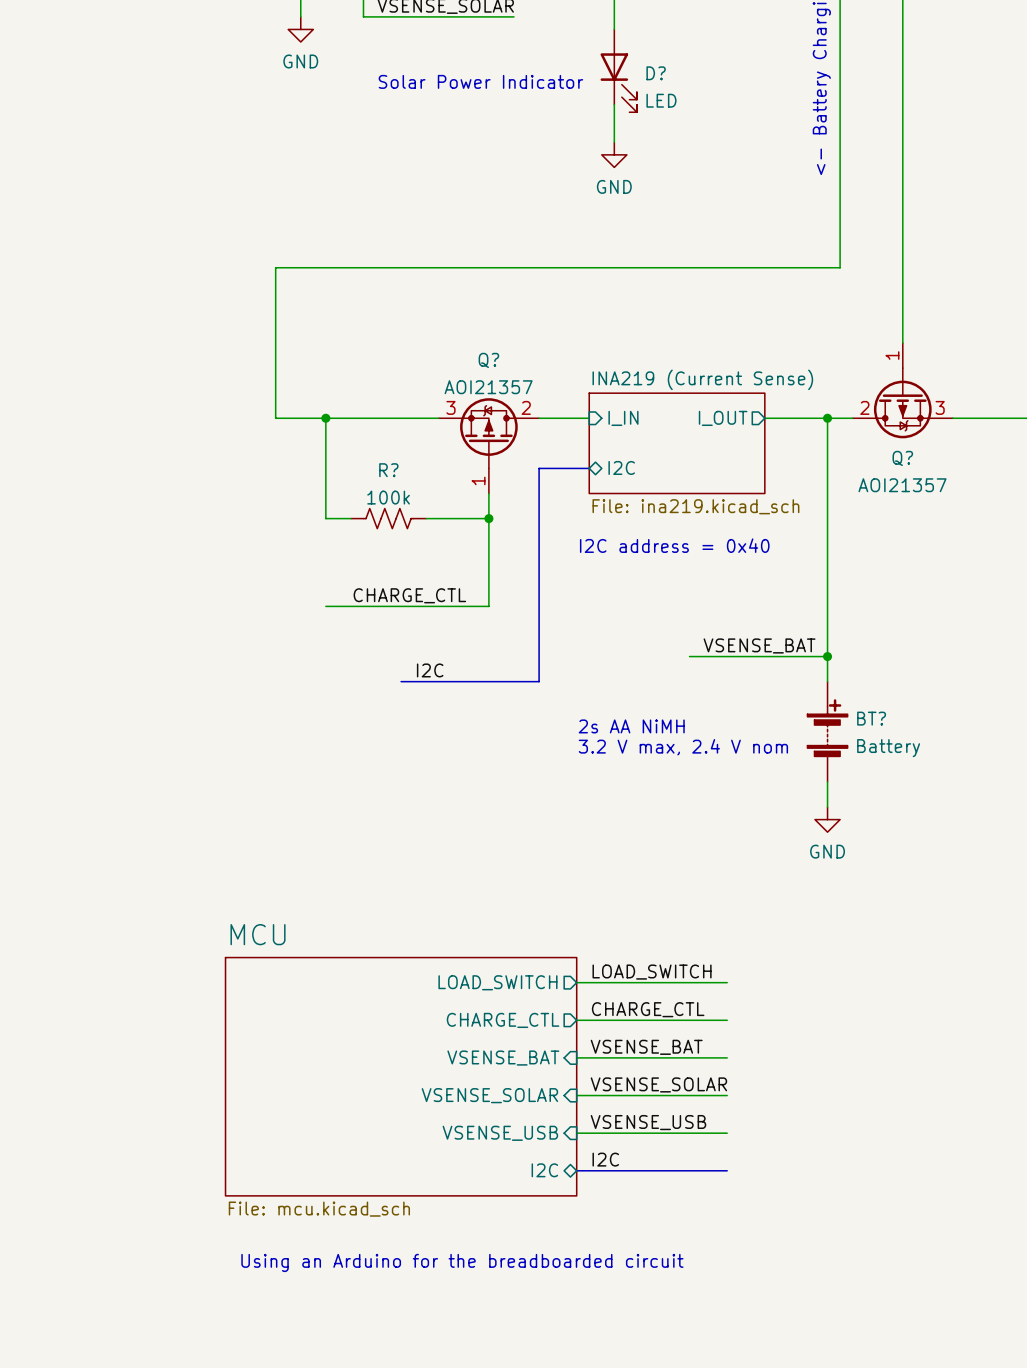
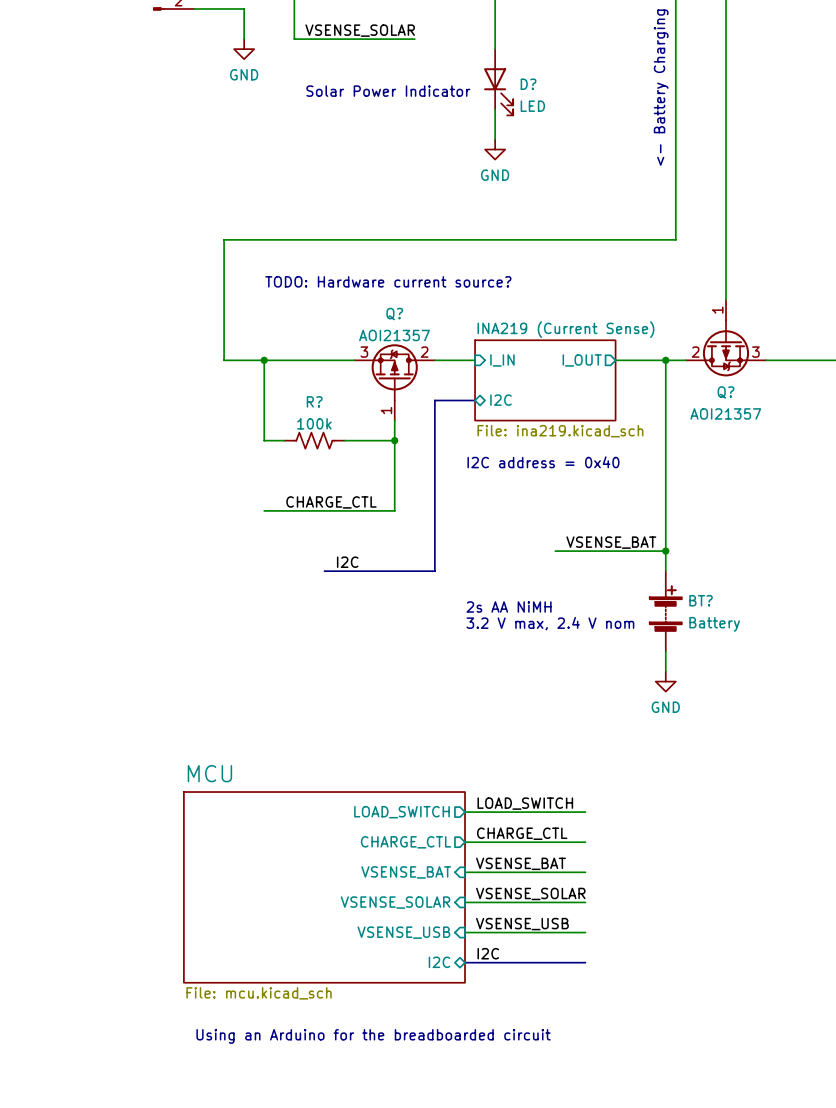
text: none -> TODO: Hardware current source? (388, 281)

